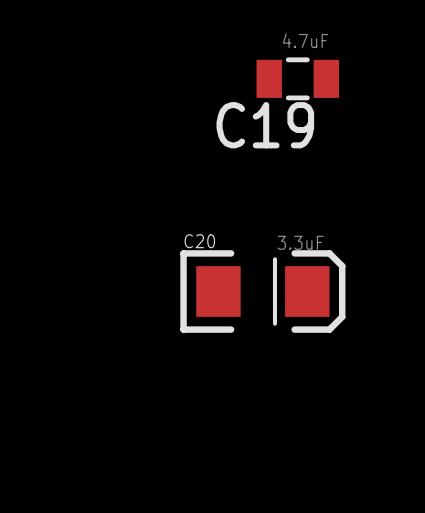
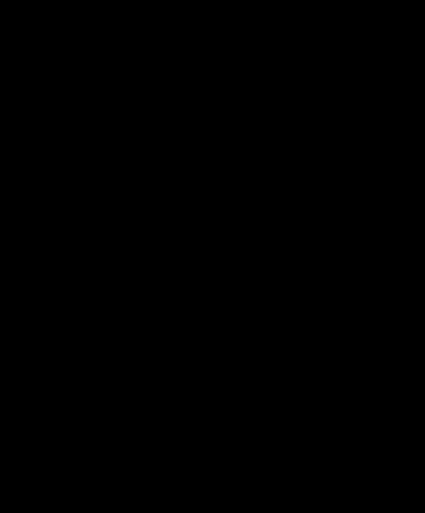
C19: 4.7uF (297, 78) -> none
C20: 3.3uF (262, 291) -> none

